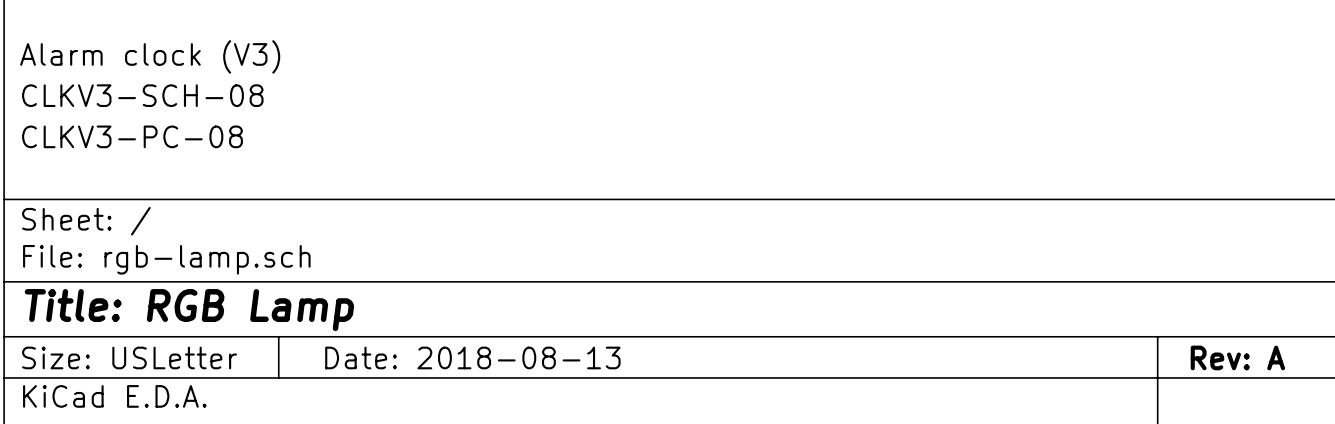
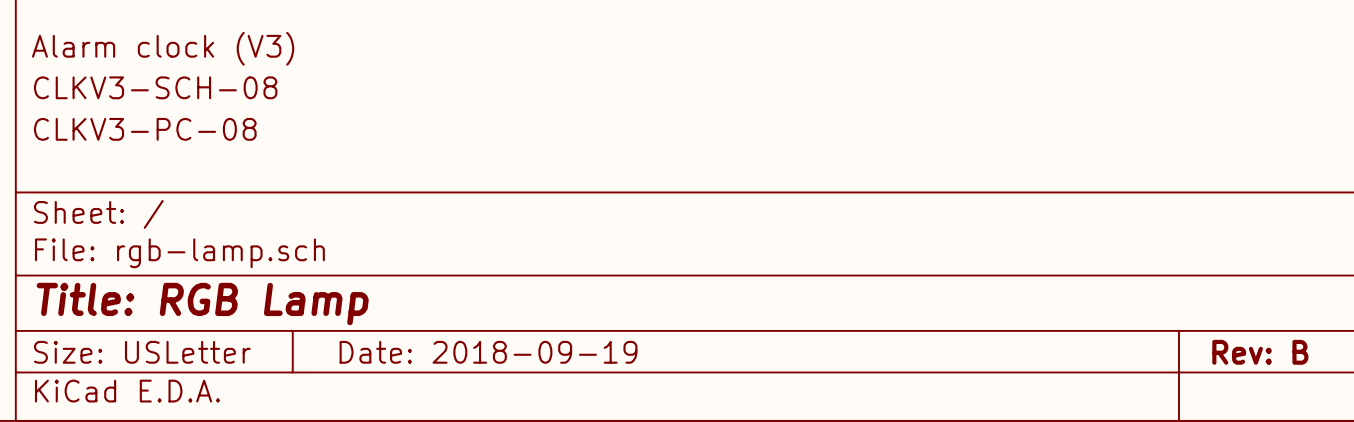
title block: Date: 2018-08-13 (472, 357) -> Date: 2018-09-19 (488, 352)
title block: Rev: A (1237, 357) -> Rev: B (1260, 352)

